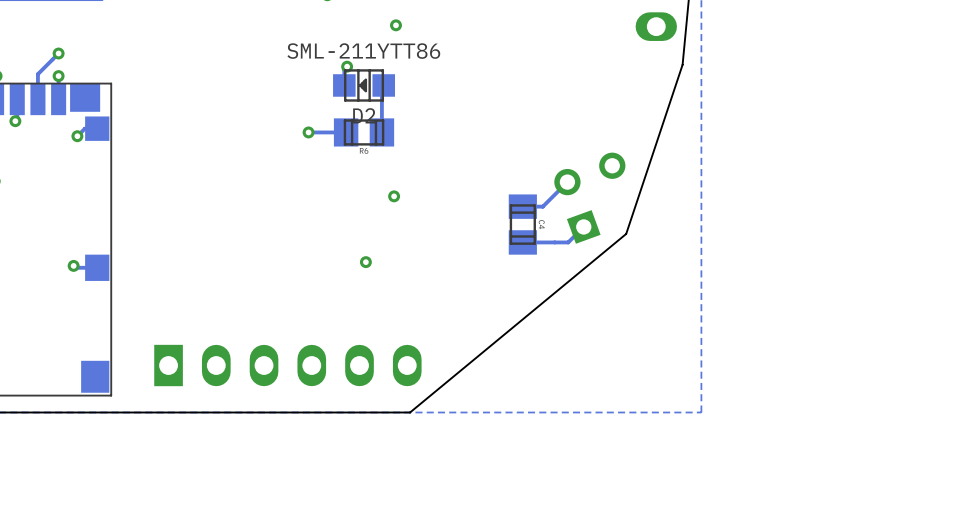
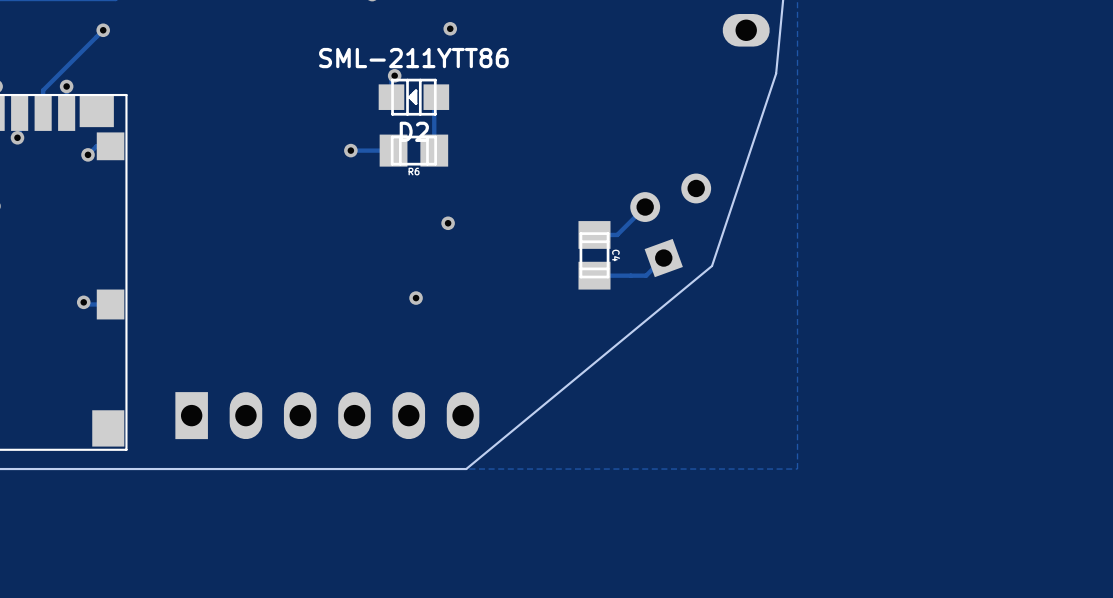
track: (58, 53) (37, 74) (37, 79) -> (103, 30) (43, 90)
via position: (58, 53) -> (103, 30)

